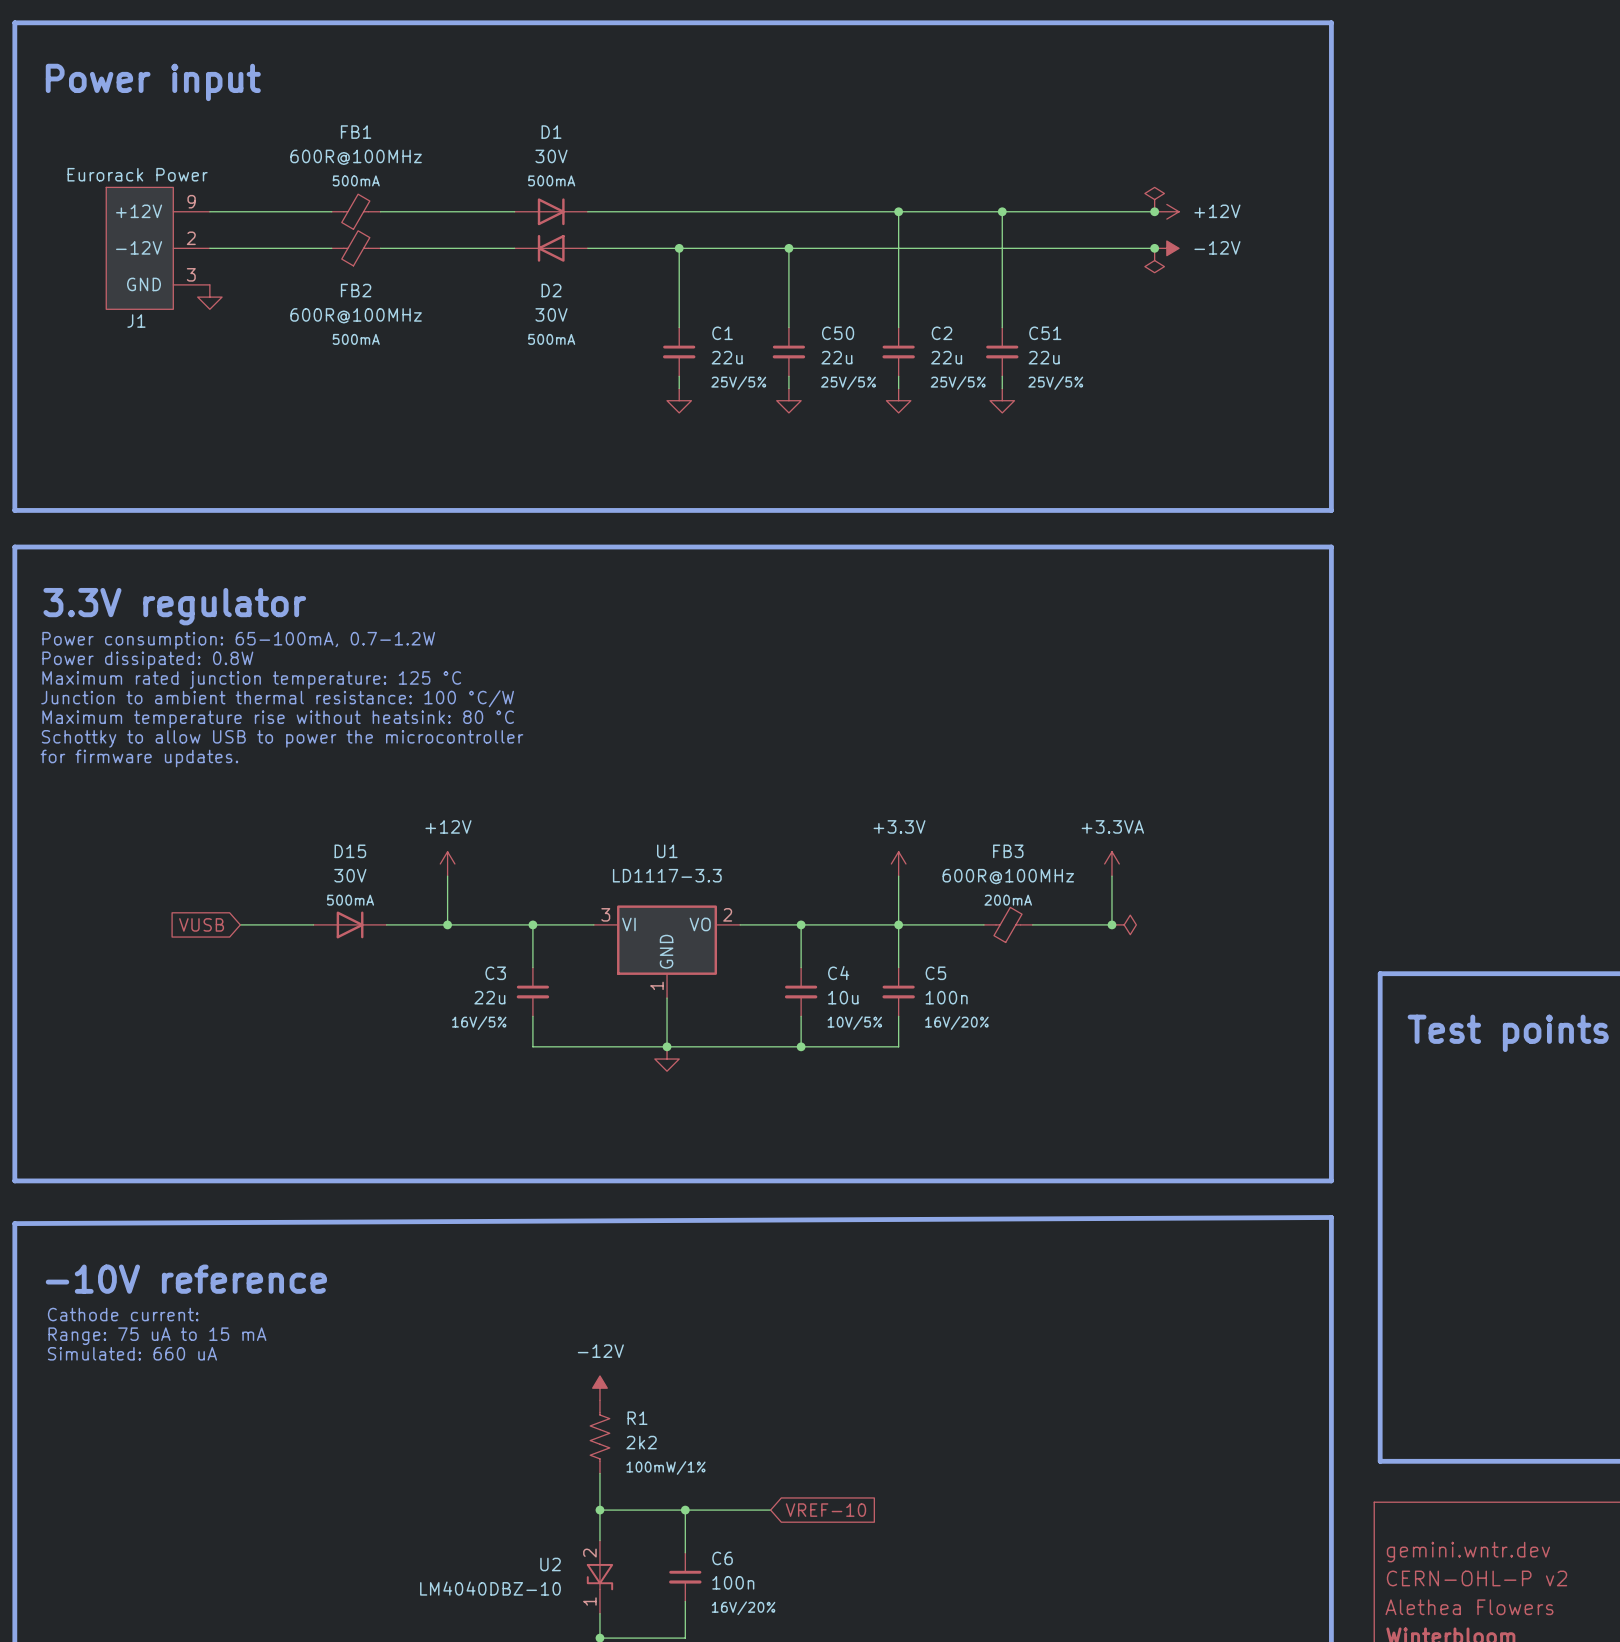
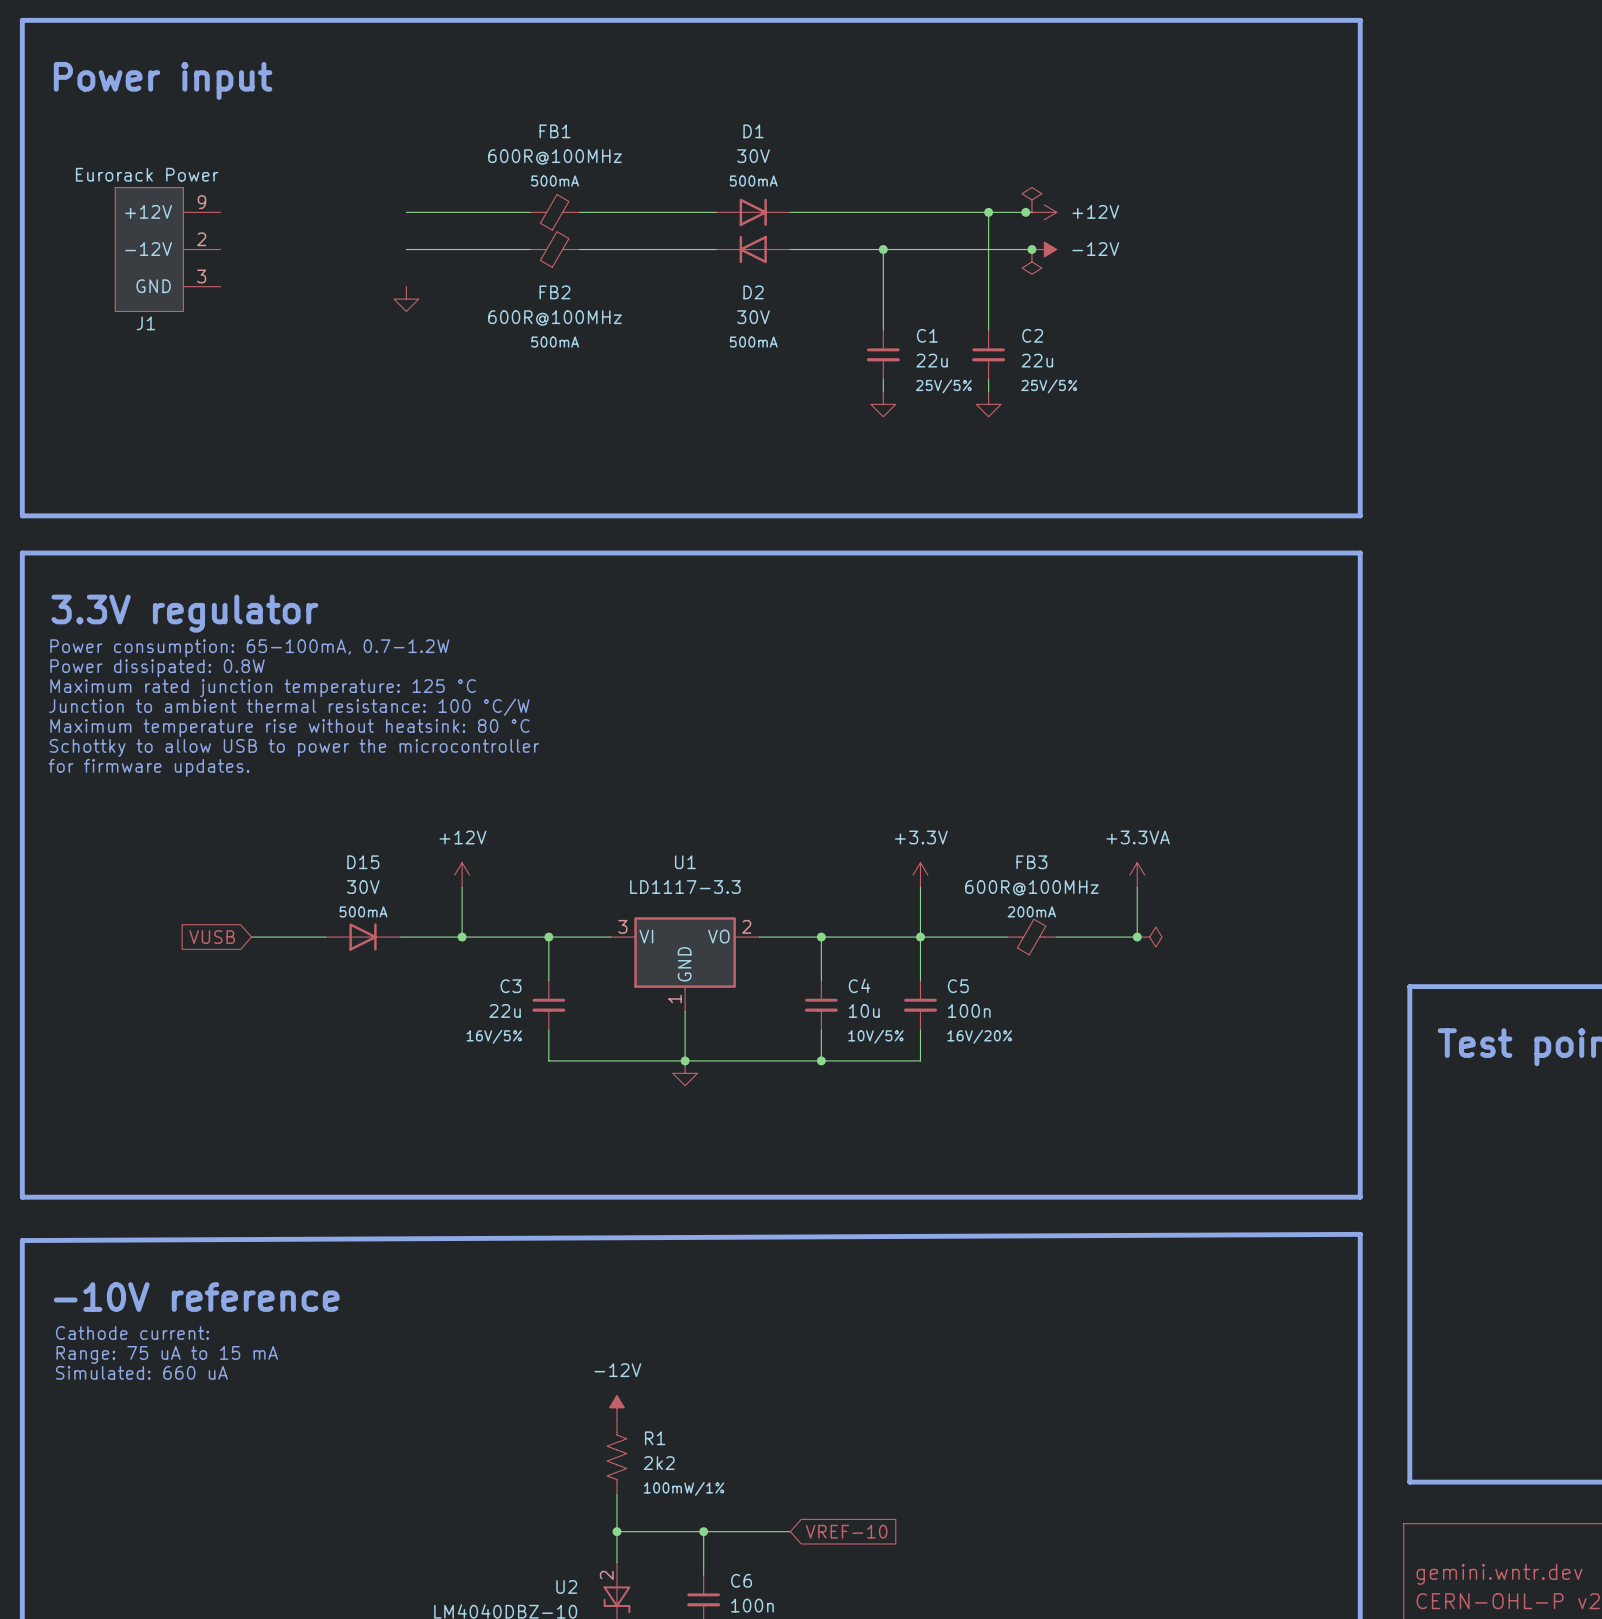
power symbol: none -> (1031, 199)
power symbol: (1154, 199) -> none
wire: (209, 211) (331, 211) -> none
FB1 position: (356, 211) -> (555, 212)
wire: (380, 211) (392, 211) -> none
D1 position: (551, 211) -> (753, 212)
wire: (898, 211) (898, 327) -> none
junction: (898, 211) -> none
junction: none -> (988, 212)
wire: (1002, 211) (1002, 327) -> (988, 212) (988, 330)
wire: (1008, 211) (1154, 211) -> none
junction: (1154, 211) -> none
power symbol position: +12V (1166, 211) -> +12V (1044, 212)
wire: (209, 248) (331, 248) -> none
FB2 position: (356, 248) -> (555, 249)
wire: (380, 248) (392, 248) -> none
D2 position: (551, 248) -> (753, 249)
wire: (679, 248) (679, 327) -> none
junction: (679, 248) -> none
wire: (788, 248) (788, 327) -> (883, 249) (883, 330)
junction: (788, 248) -> none
junction: none -> (883, 249)
wire: (1008, 248) (1154, 248) -> none
junction: none -> (1031, 249)
junction: (1154, 248) -> none
power symbol position: -12V (1166, 248) -> -12V (1044, 249)
power symbol: none -> (1031, 261)
power symbol: (1154, 260) -> none
power symbol: (209, 297) -> none
power symbol: none -> (406, 299)
C1 position: (679, 351) -> (883, 354)
C50: 22u (788, 351) -> none
C2 position: (898, 351) -> (988, 354)
C51: 22u (1002, 351) -> none
wire: (679, 376) (679, 388) -> none
wire: (788, 376) (788, 388) -> none
wire: (898, 376) (898, 388) -> (883, 379) (883, 391)
wire: (1002, 376) (1002, 388) -> (988, 379) (988, 391)
power symbol: (679, 400) -> none
power symbol: (788, 400) -> none
power symbol: none -> (883, 404)
power symbol: (898, 400) -> none
power symbol: none -> (988, 404)
power symbol: (1002, 400) -> none

